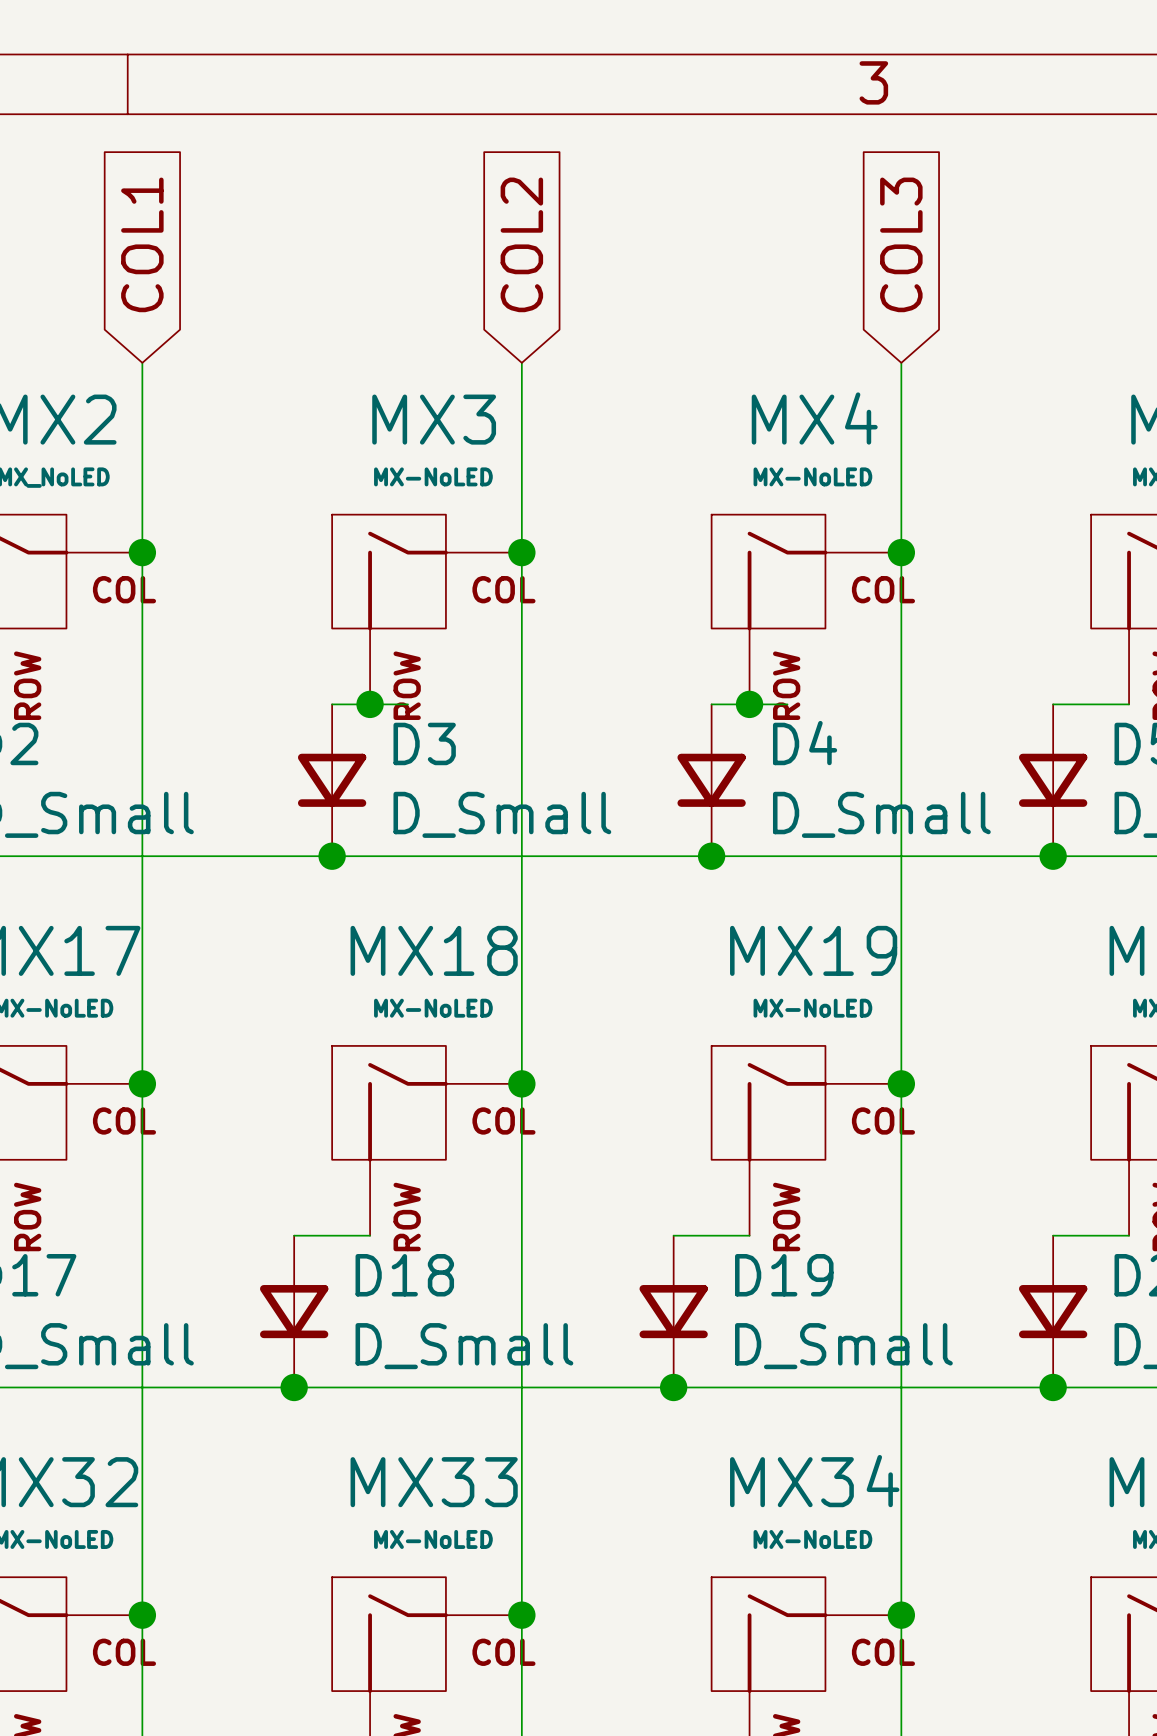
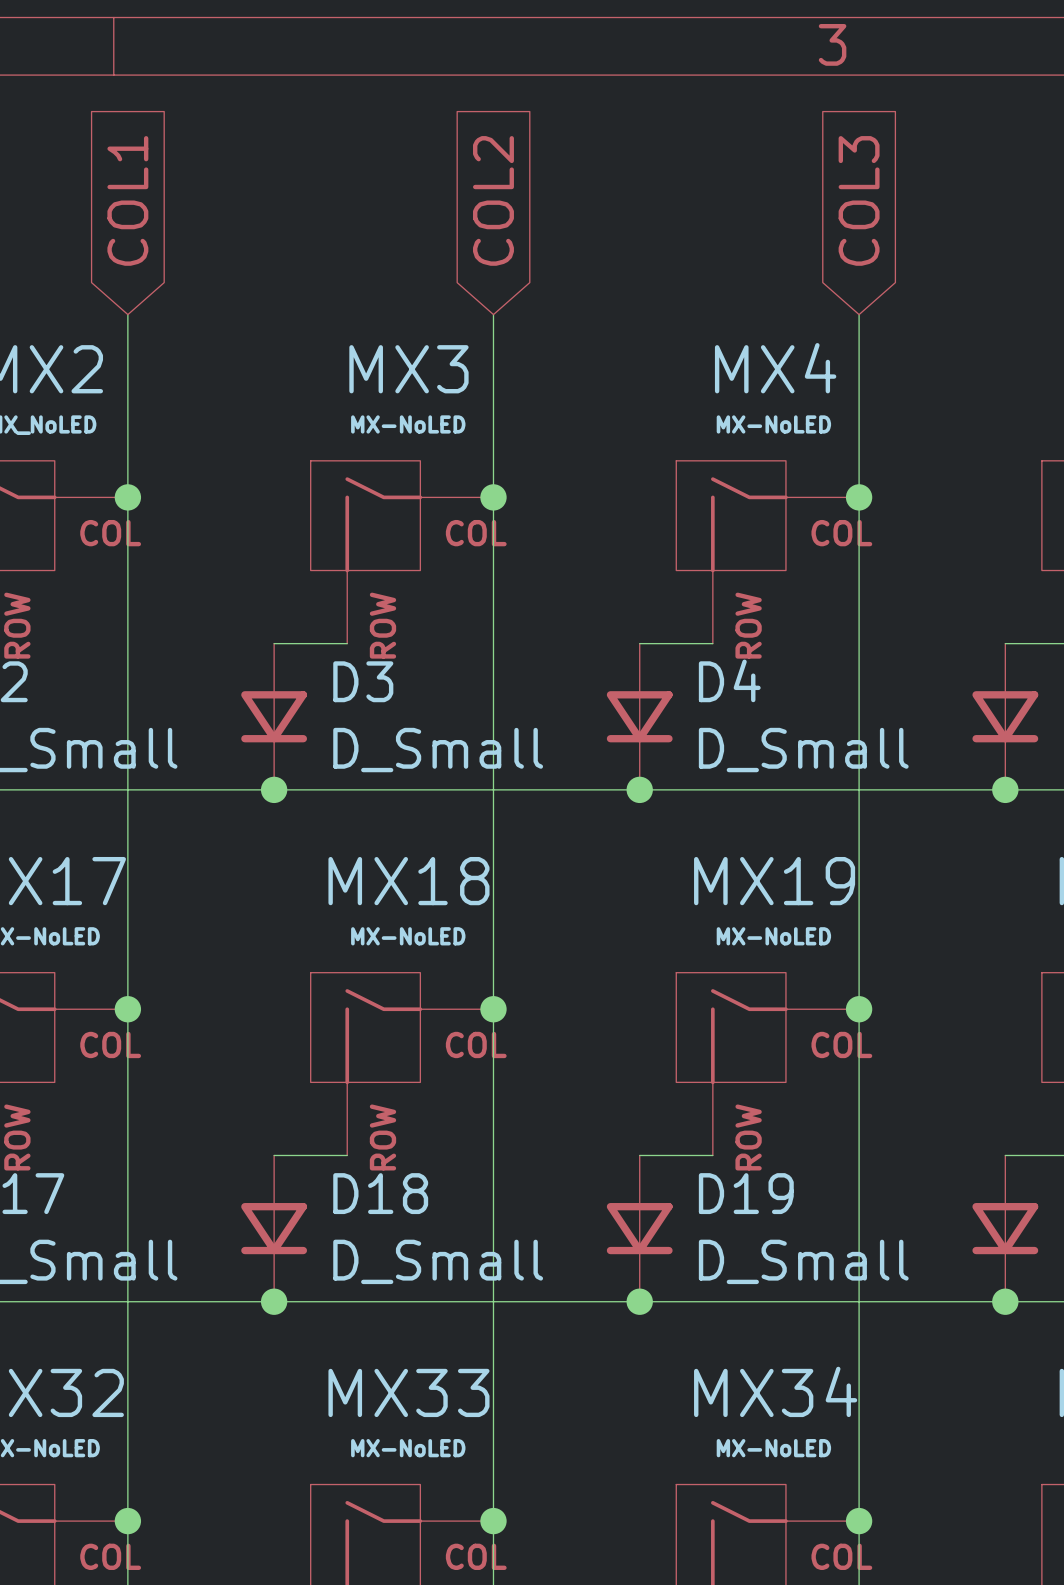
wire: (370, 704) (408, 704) -> (274, 643) (310, 643)
junction: (370, 704) -> none
wire: (749, 704) (787, 704) -> (639, 643) (676, 643)
junction: (749, 704) -> none
D3 position: (332, 780) -> (274, 716)
D4 position: (711, 780) -> (639, 716)
junction position: (332, 856) -> (274, 789)
junction position: (711, 856) -> (639, 789)

